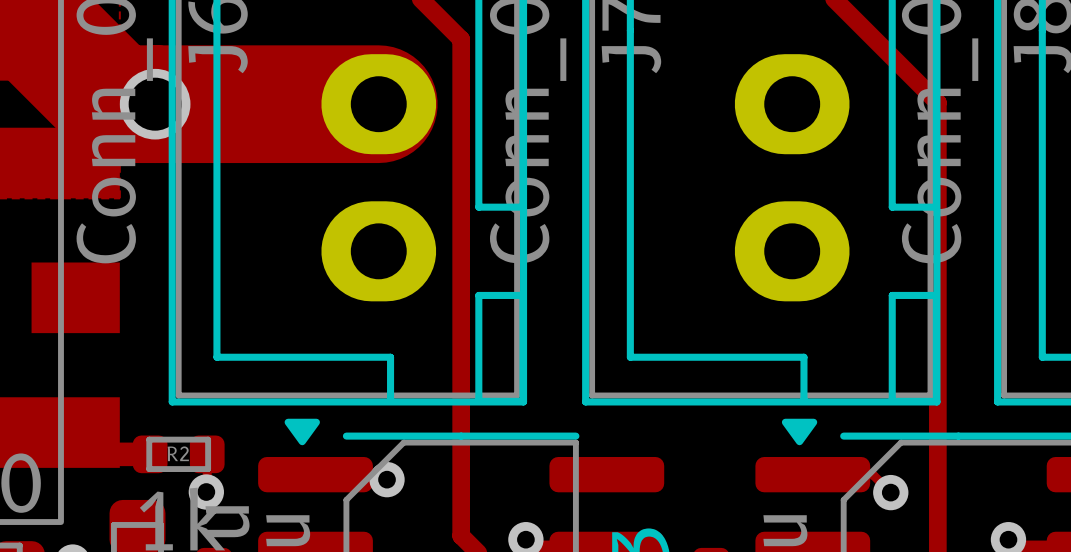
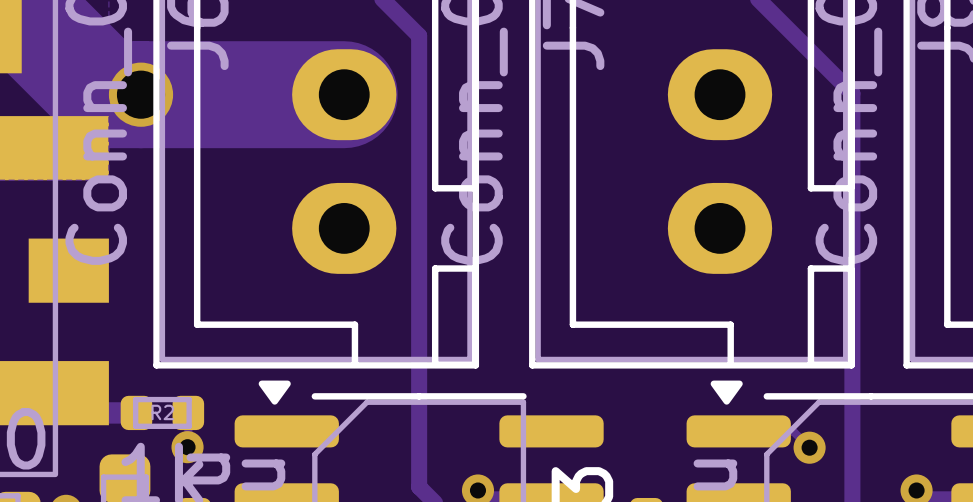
via: (387, 479) -> none

